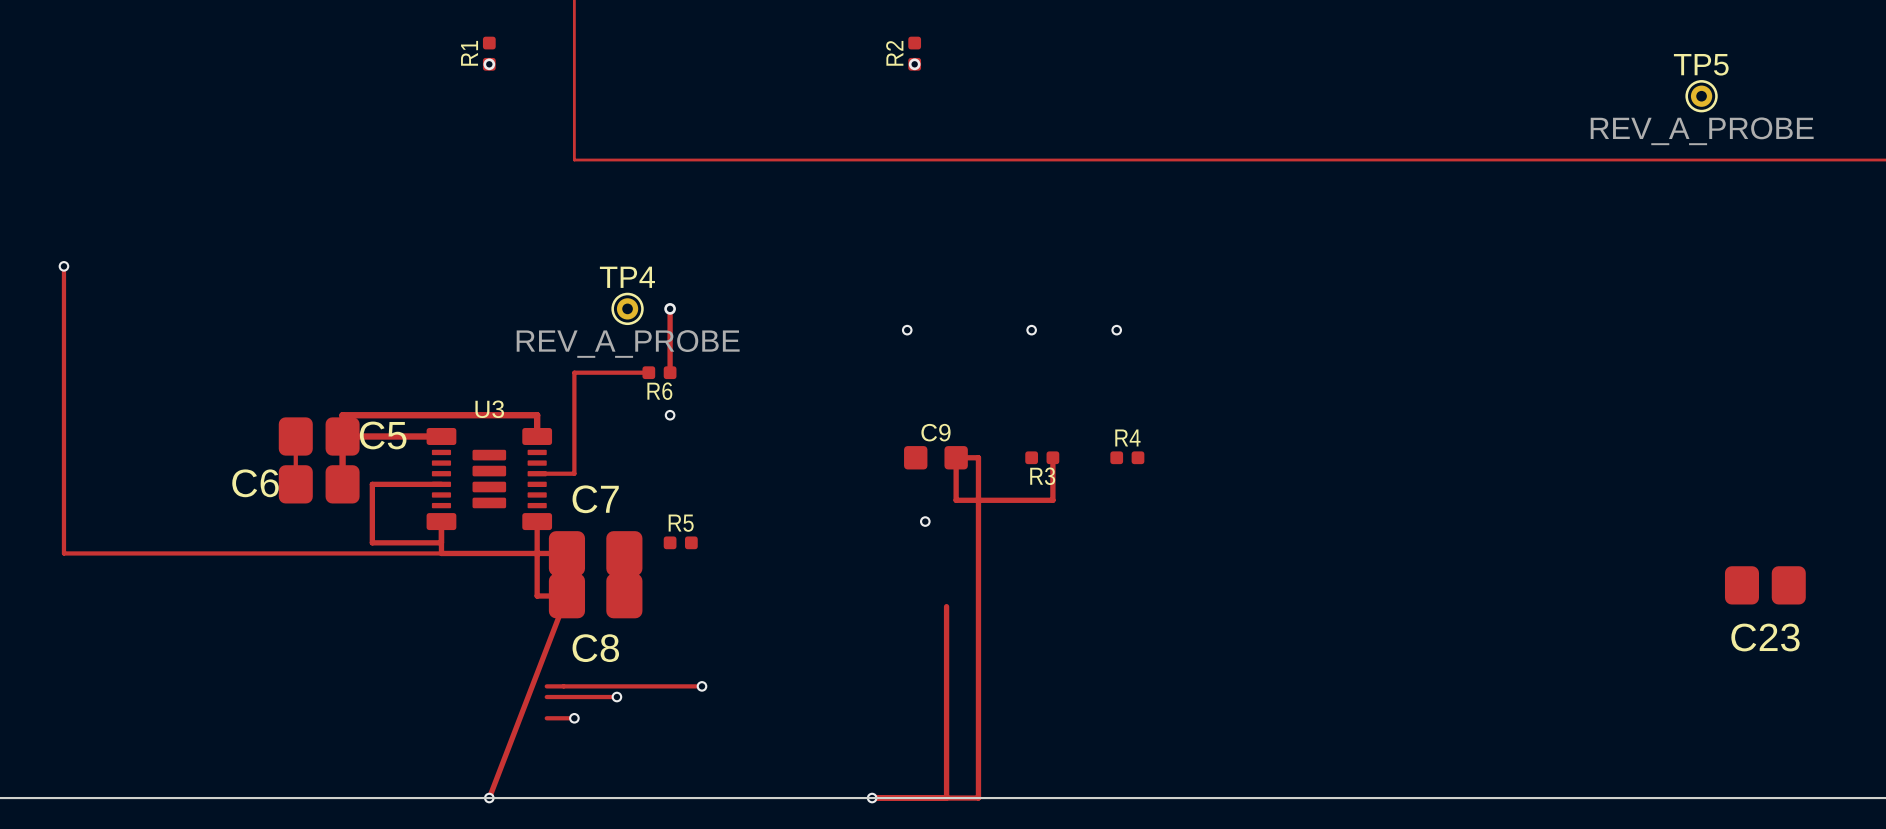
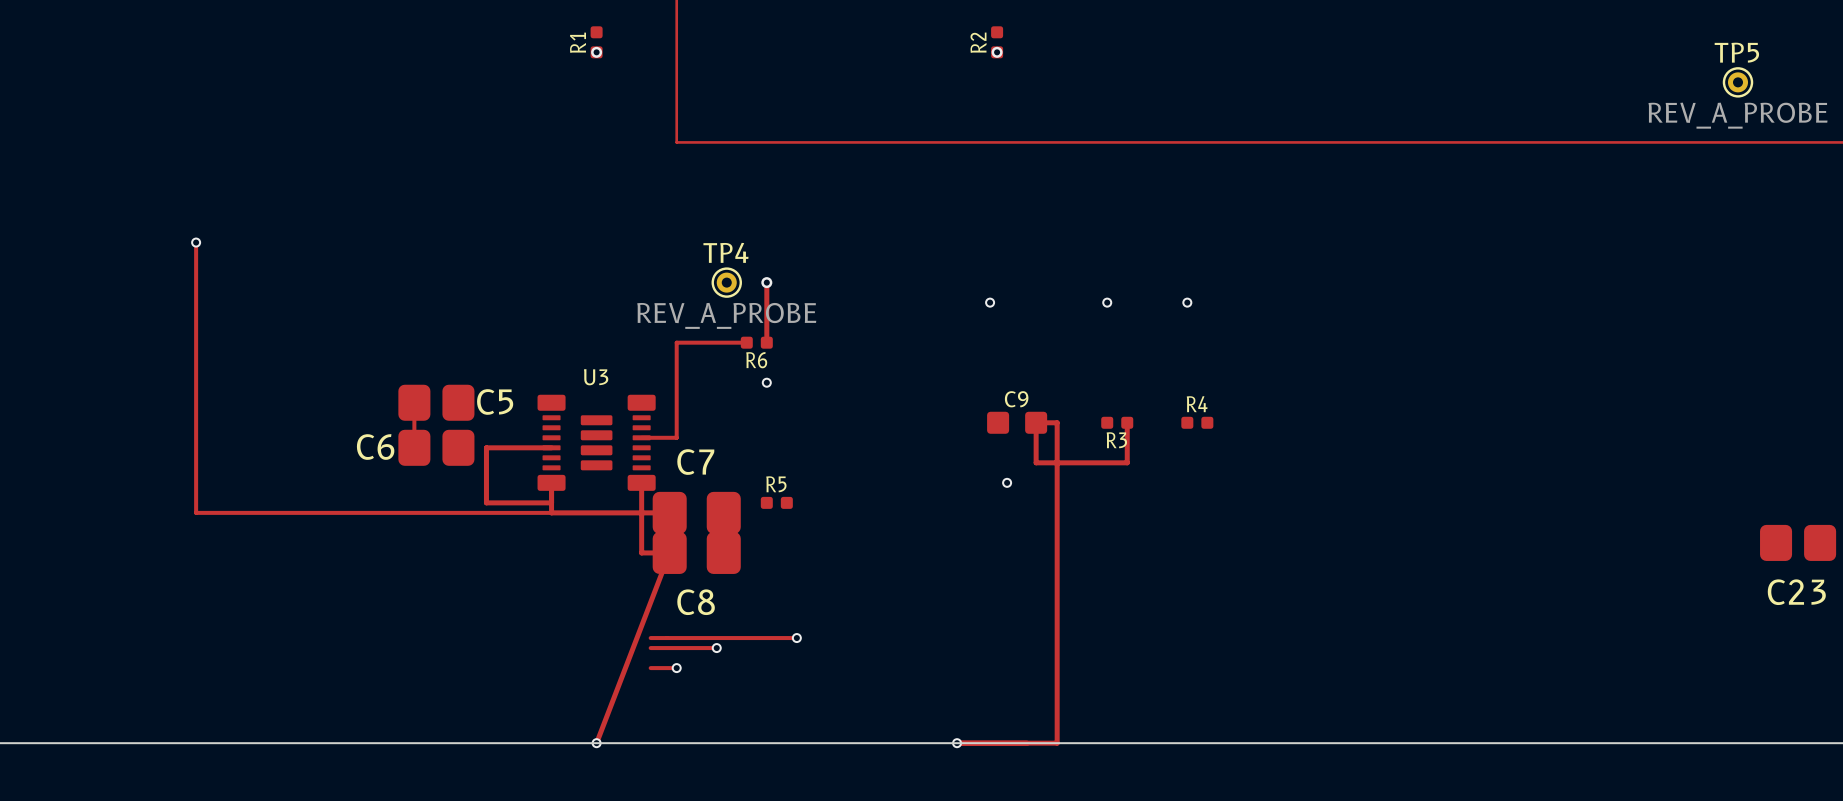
track: (342, 436) (441, 436) -> none
track: (537, 436) (537, 415) (342, 415) (342, 484) -> none
track: (946, 606) (946, 798) -> none

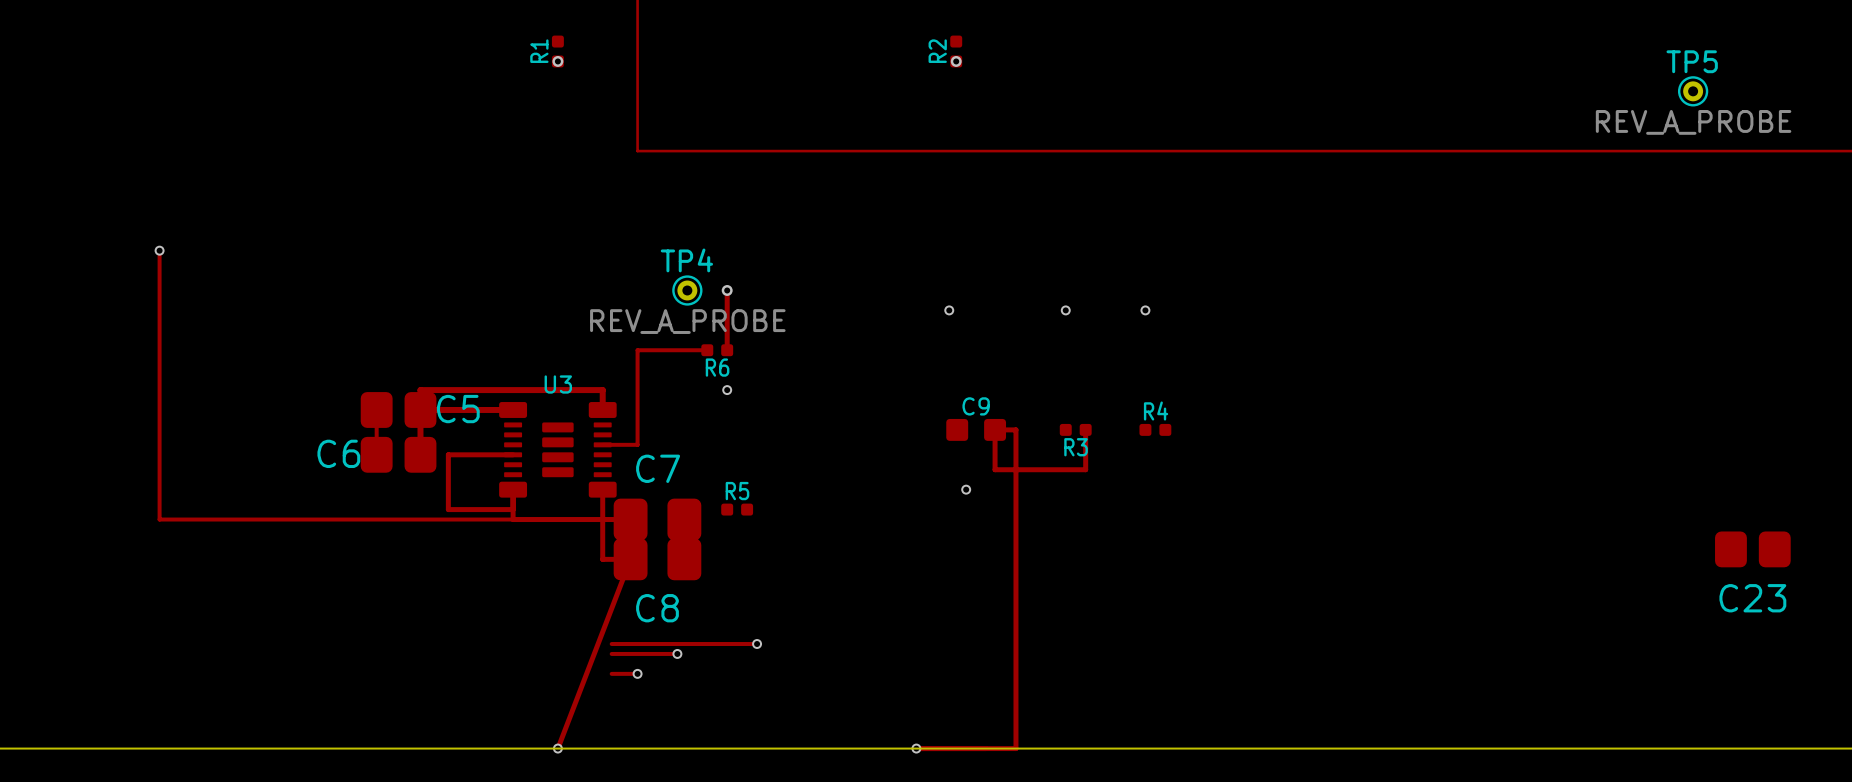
track: none -> (420, 409) (513, 409)
track: none -> (602, 409) (602, 390) (420, 390) (420, 454)

